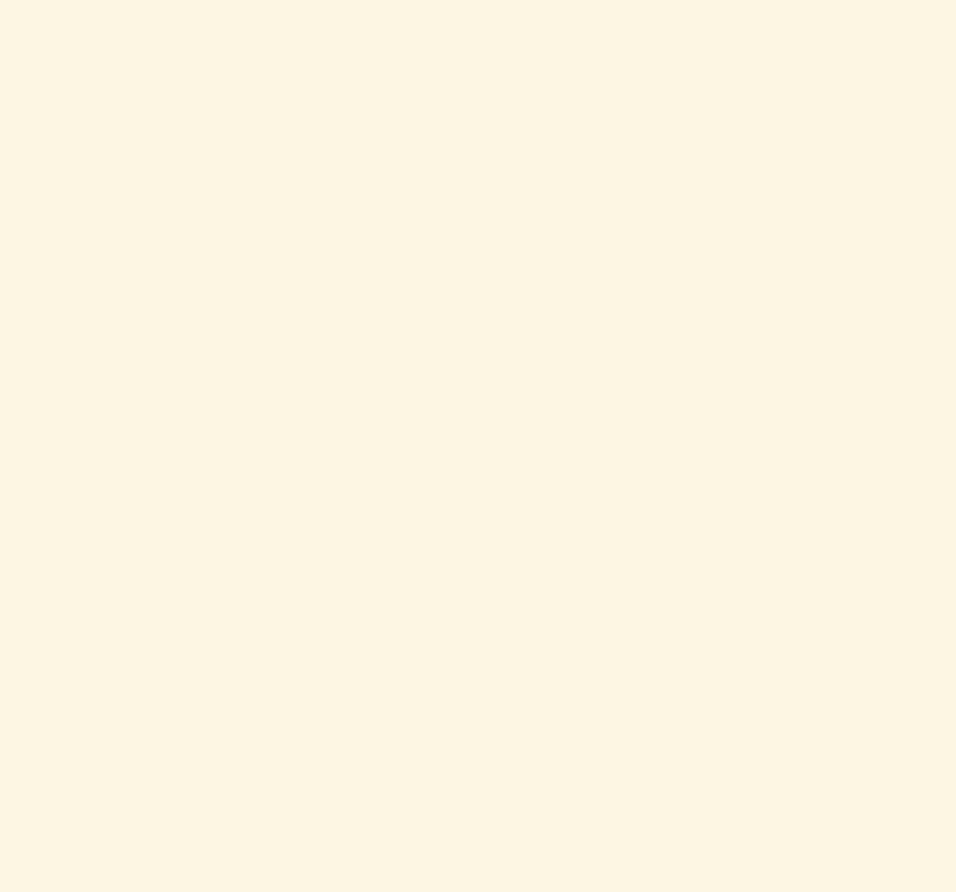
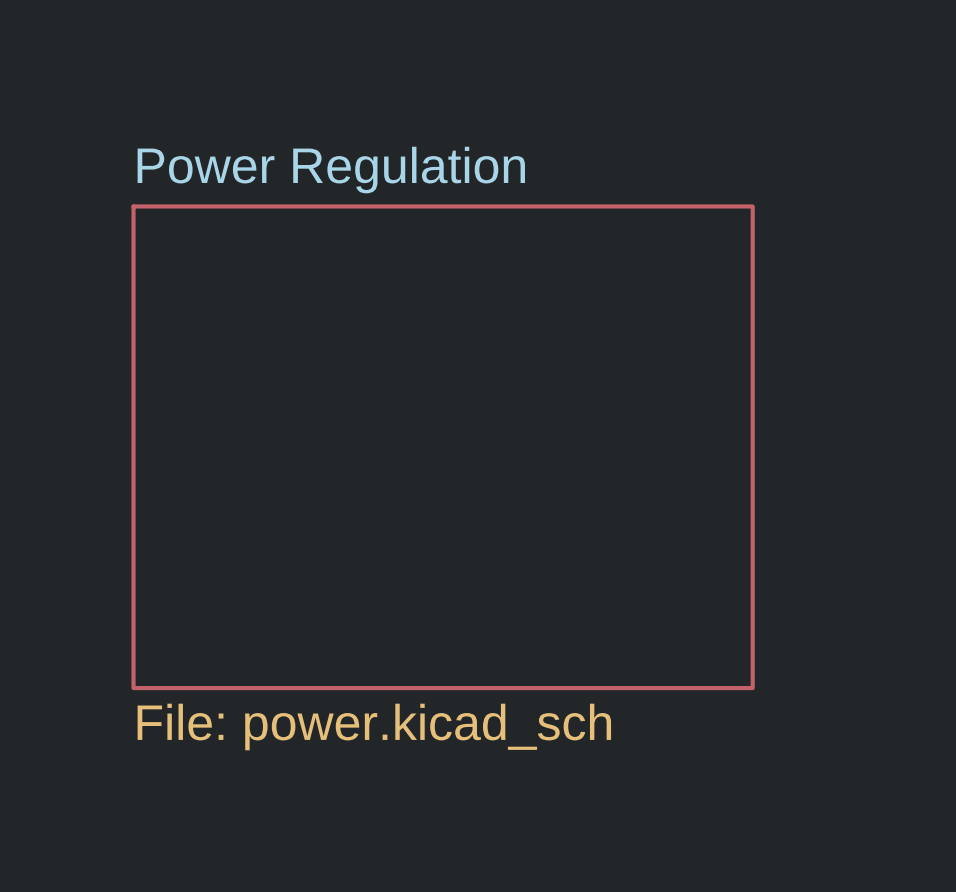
sheet Power Regulation: none -> File: power.kicad_sch (443, 447)

